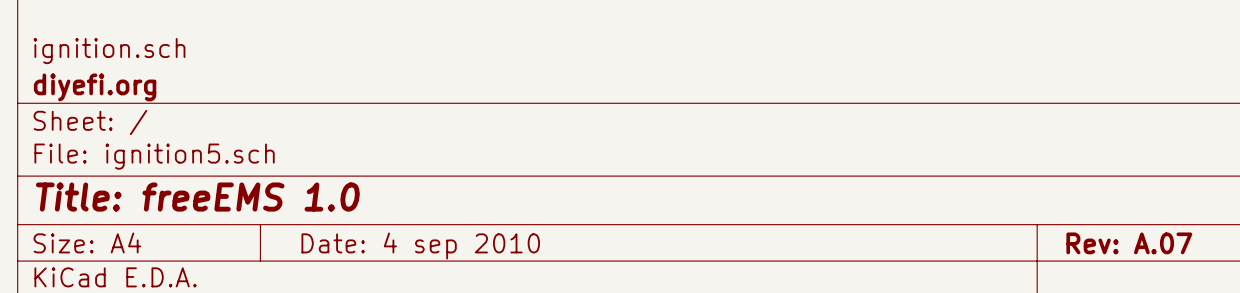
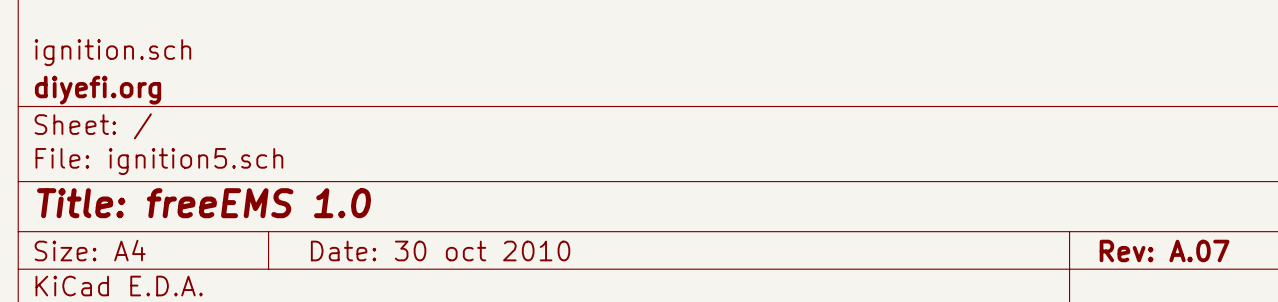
title block: Date: 4 sep 2010 (420, 245) -> Date: 30 oct 2010 (440, 250)

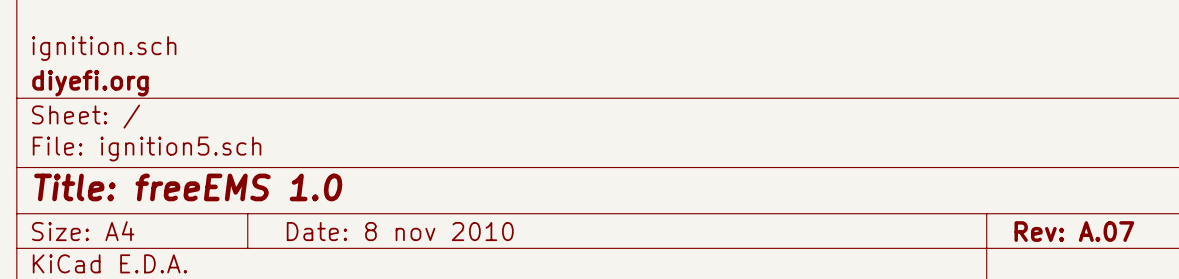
title block: Date: 30 oct 2010 (440, 250) -> Date: 8 nov 2010 (400, 231)

